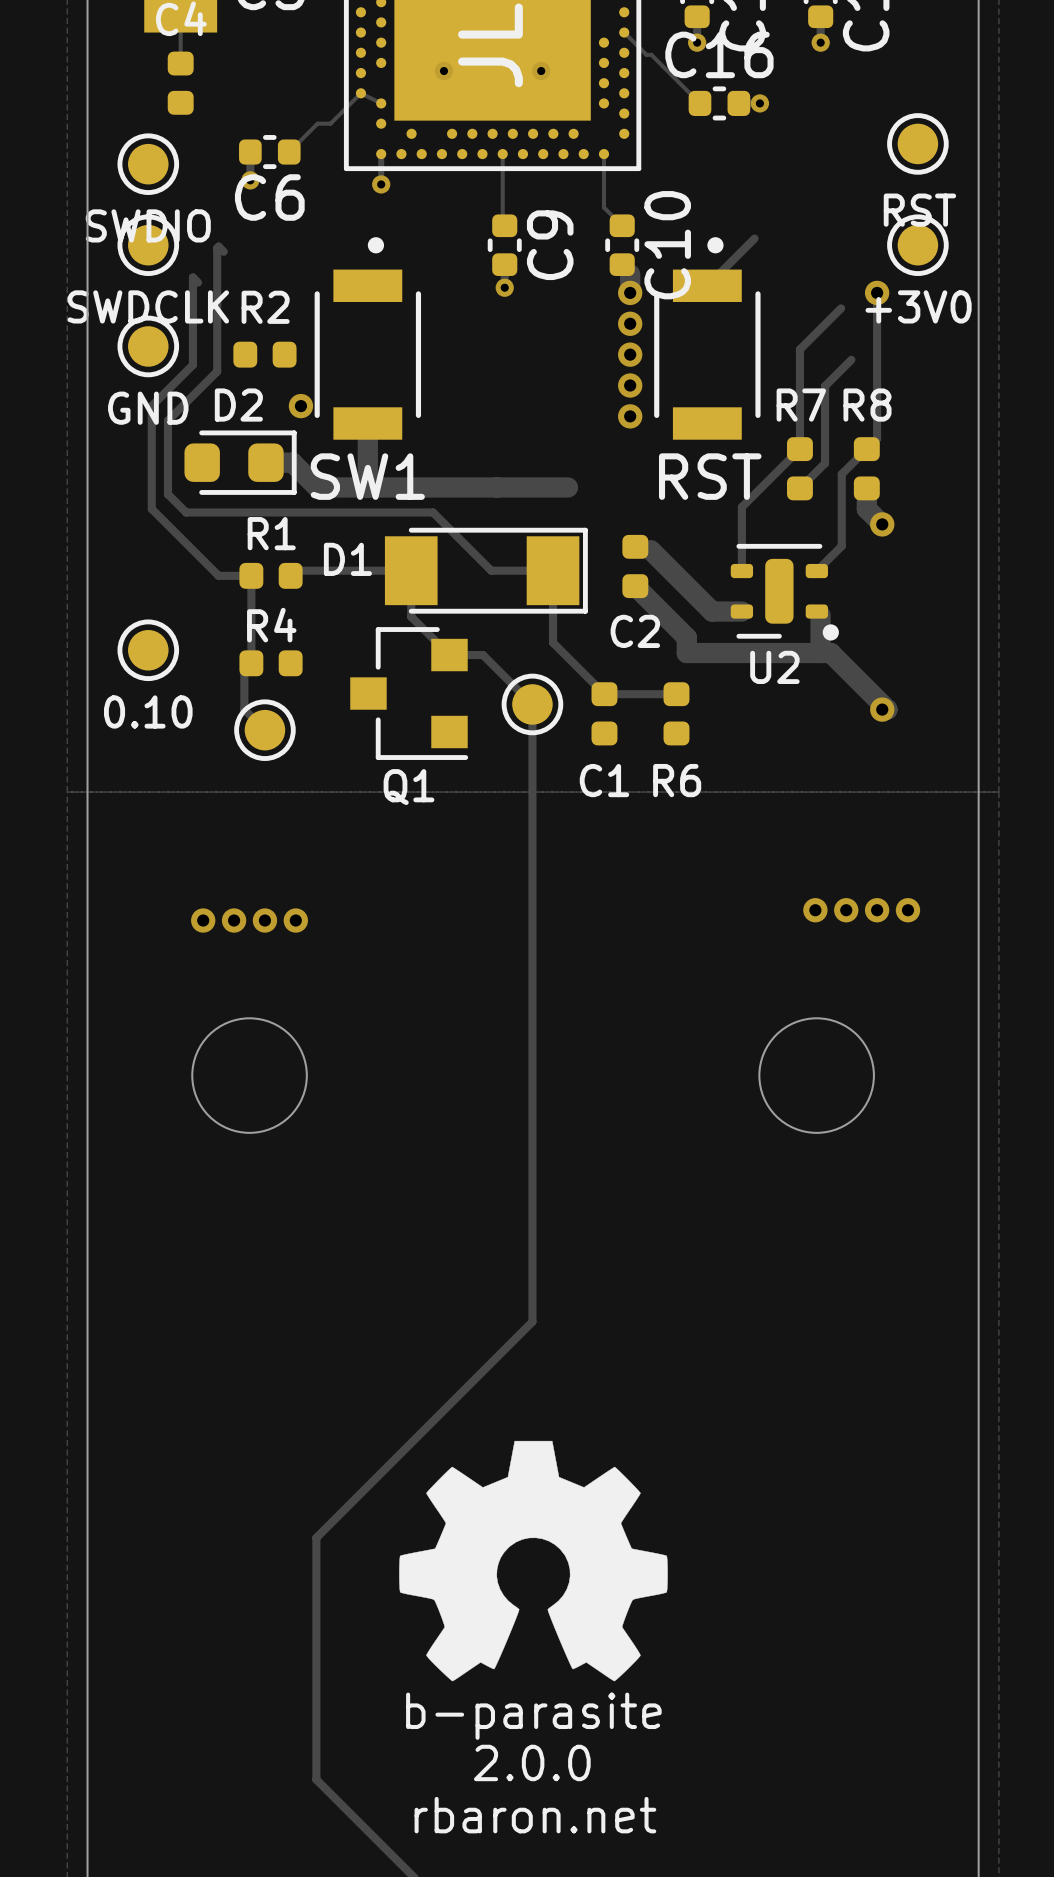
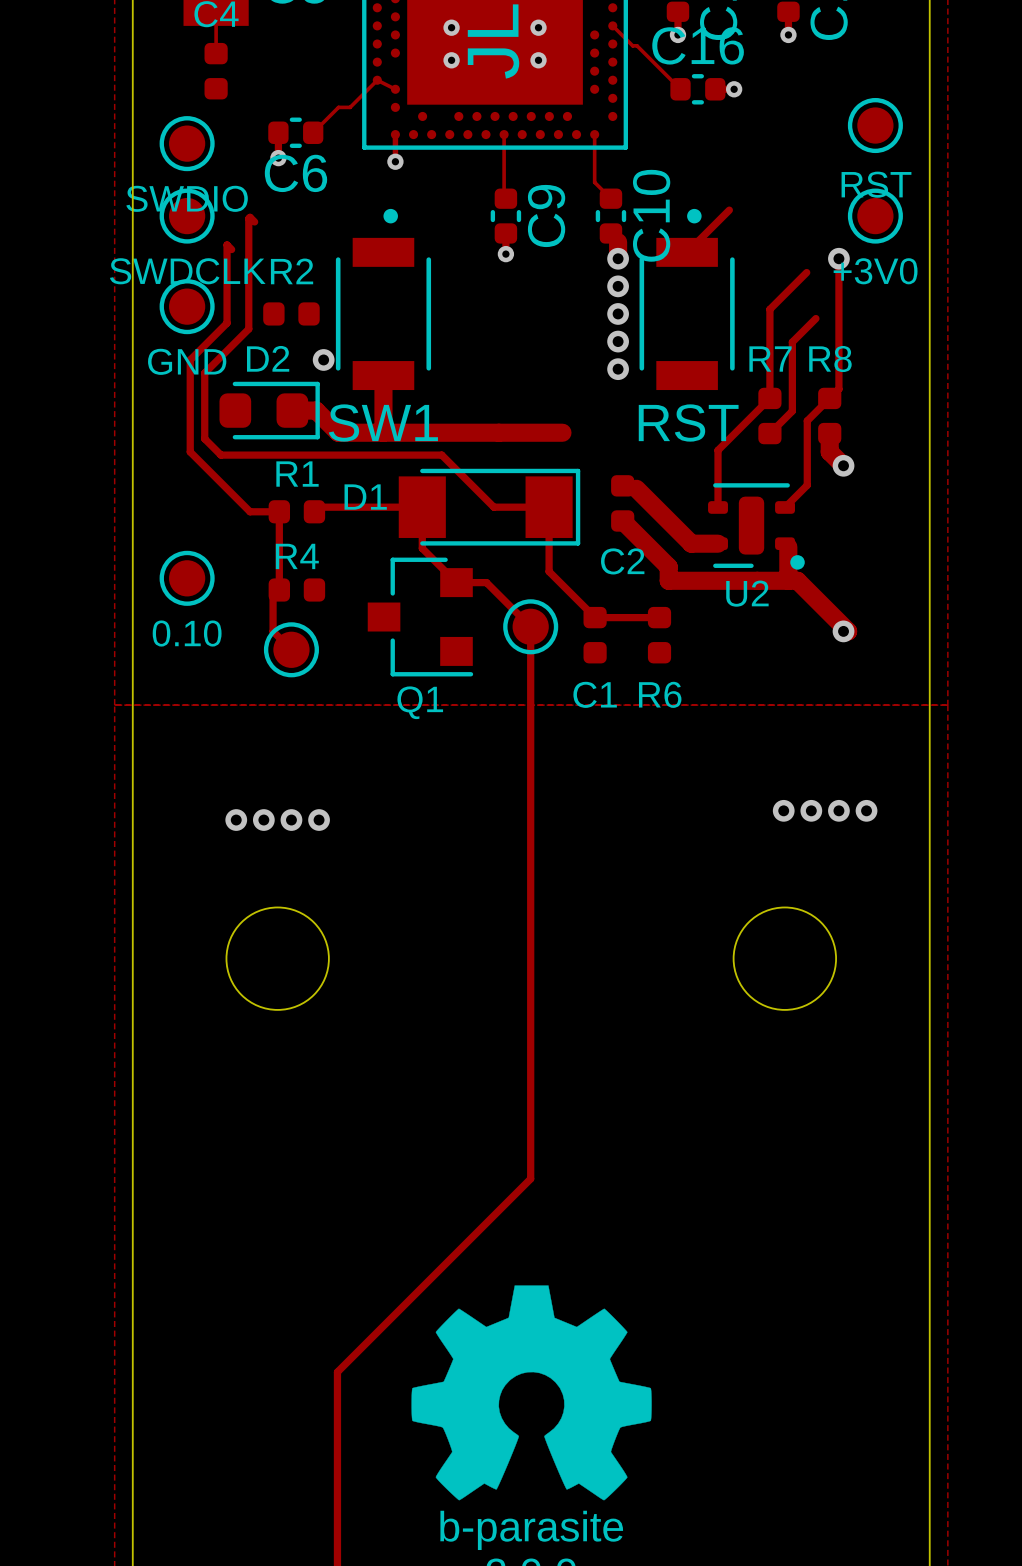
via: none -> (451, 27)
via: none -> (538, 27)

